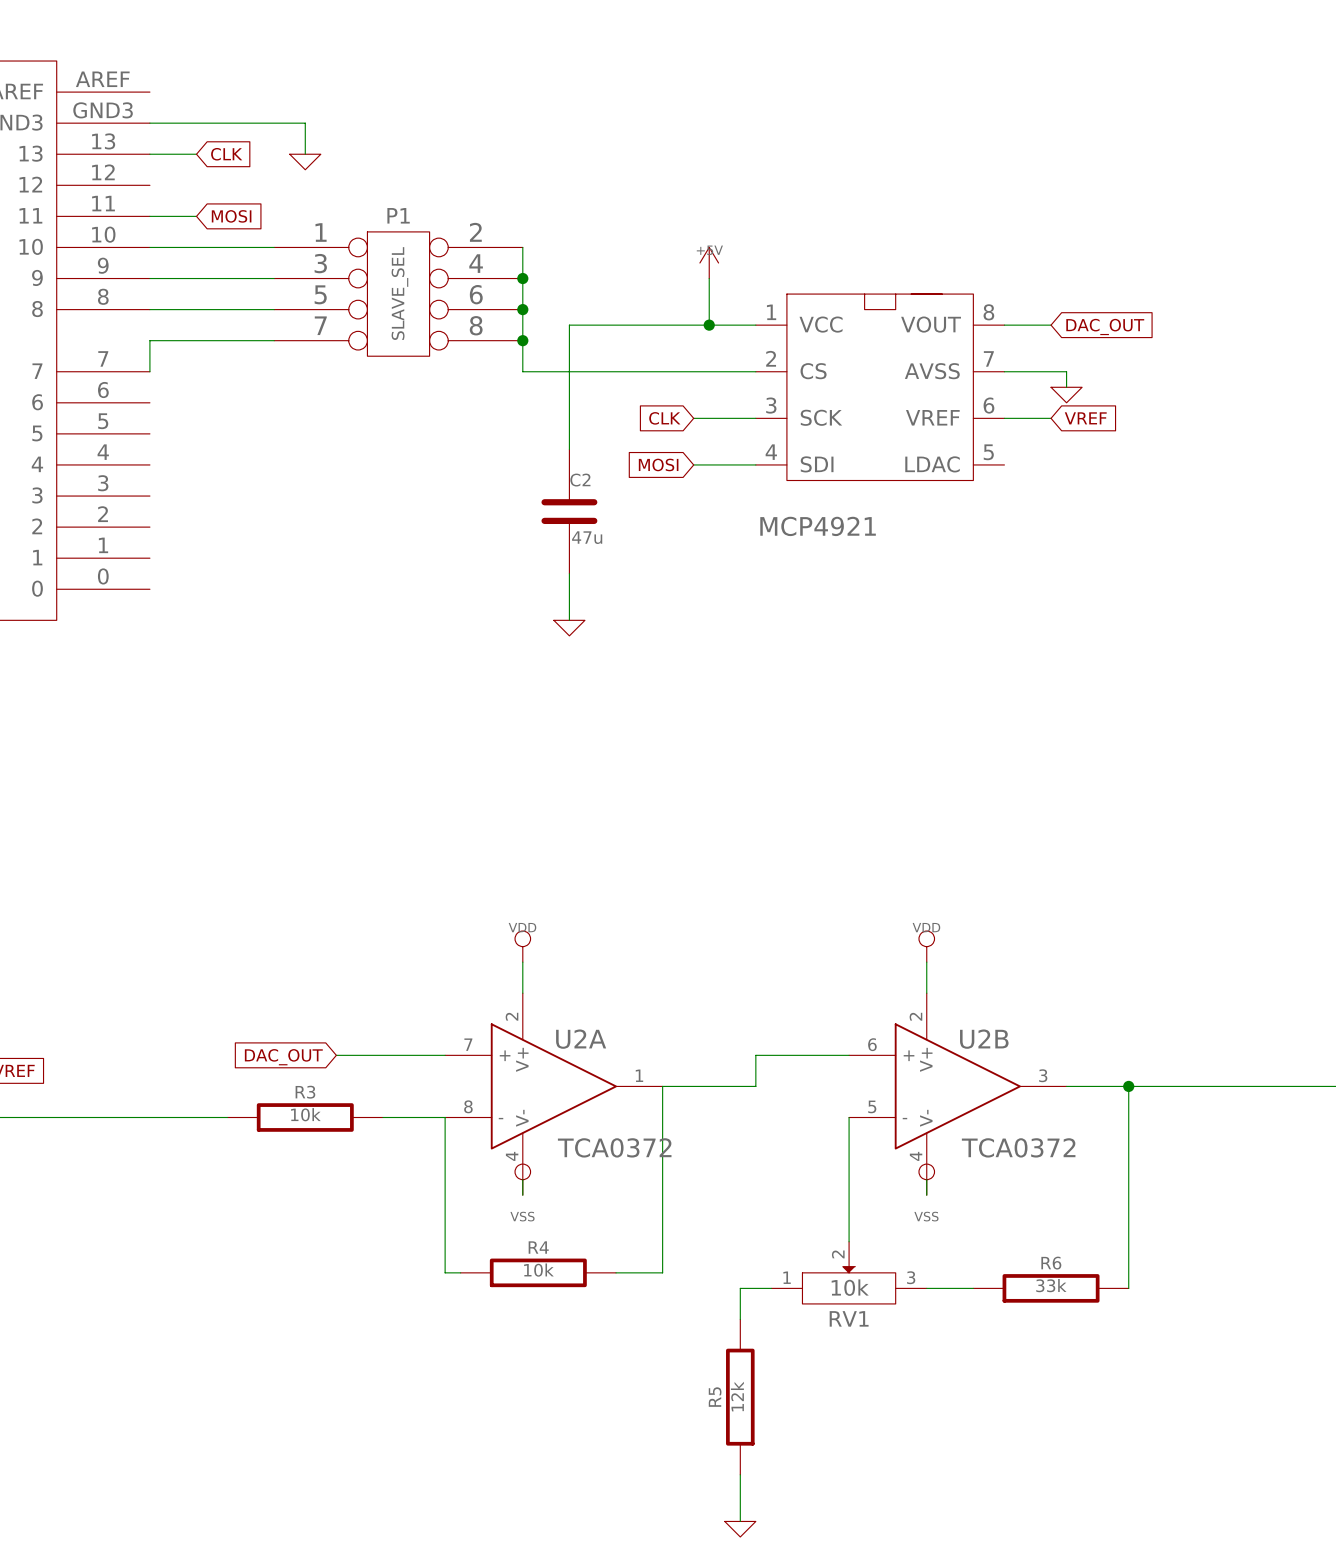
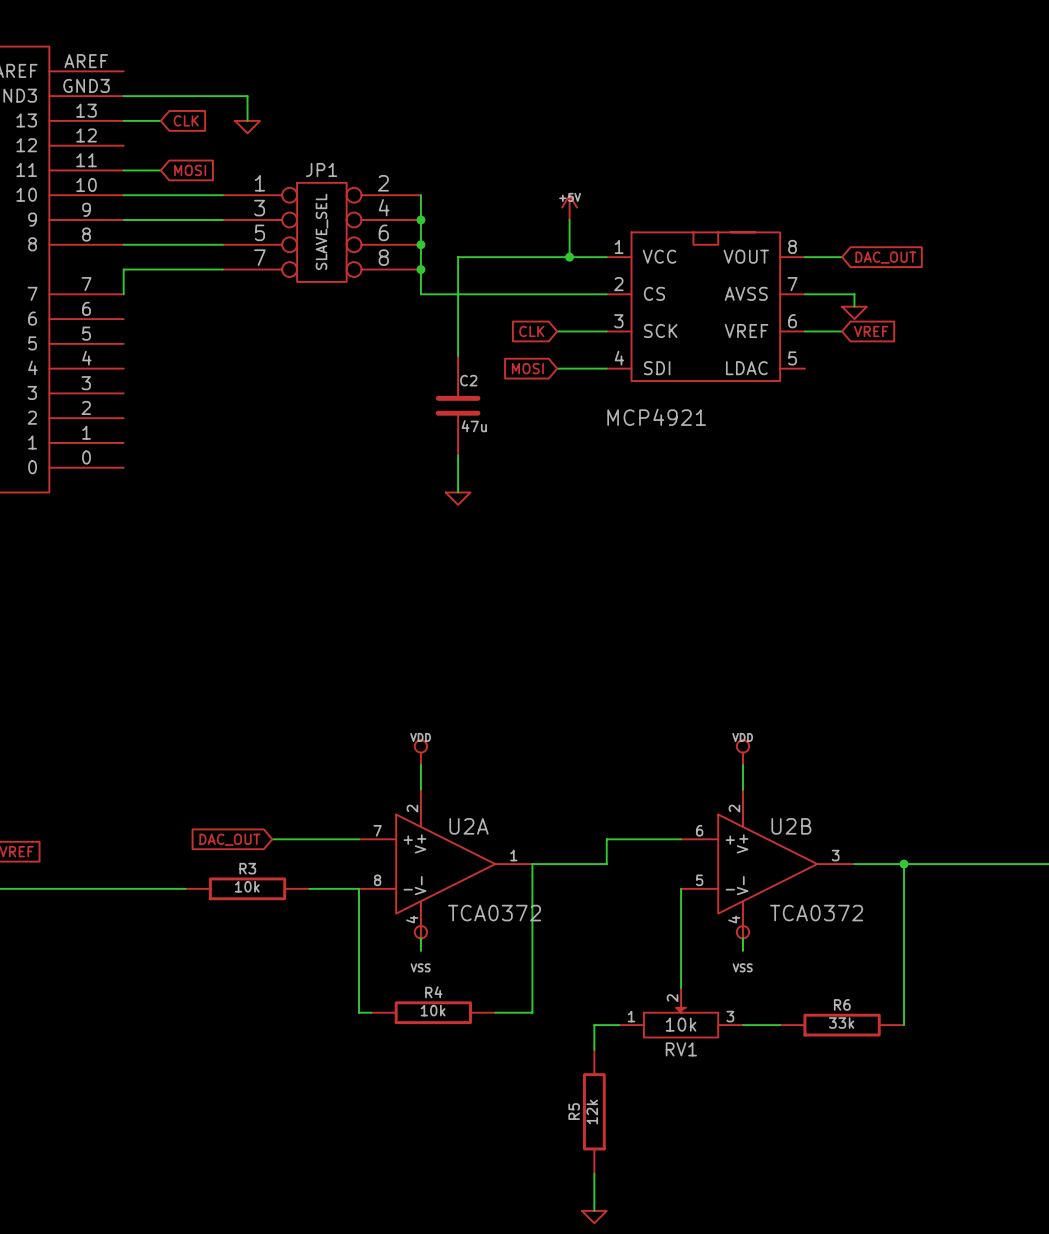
P1 name: P1 (398, 215) -> JP1 (321, 169)

